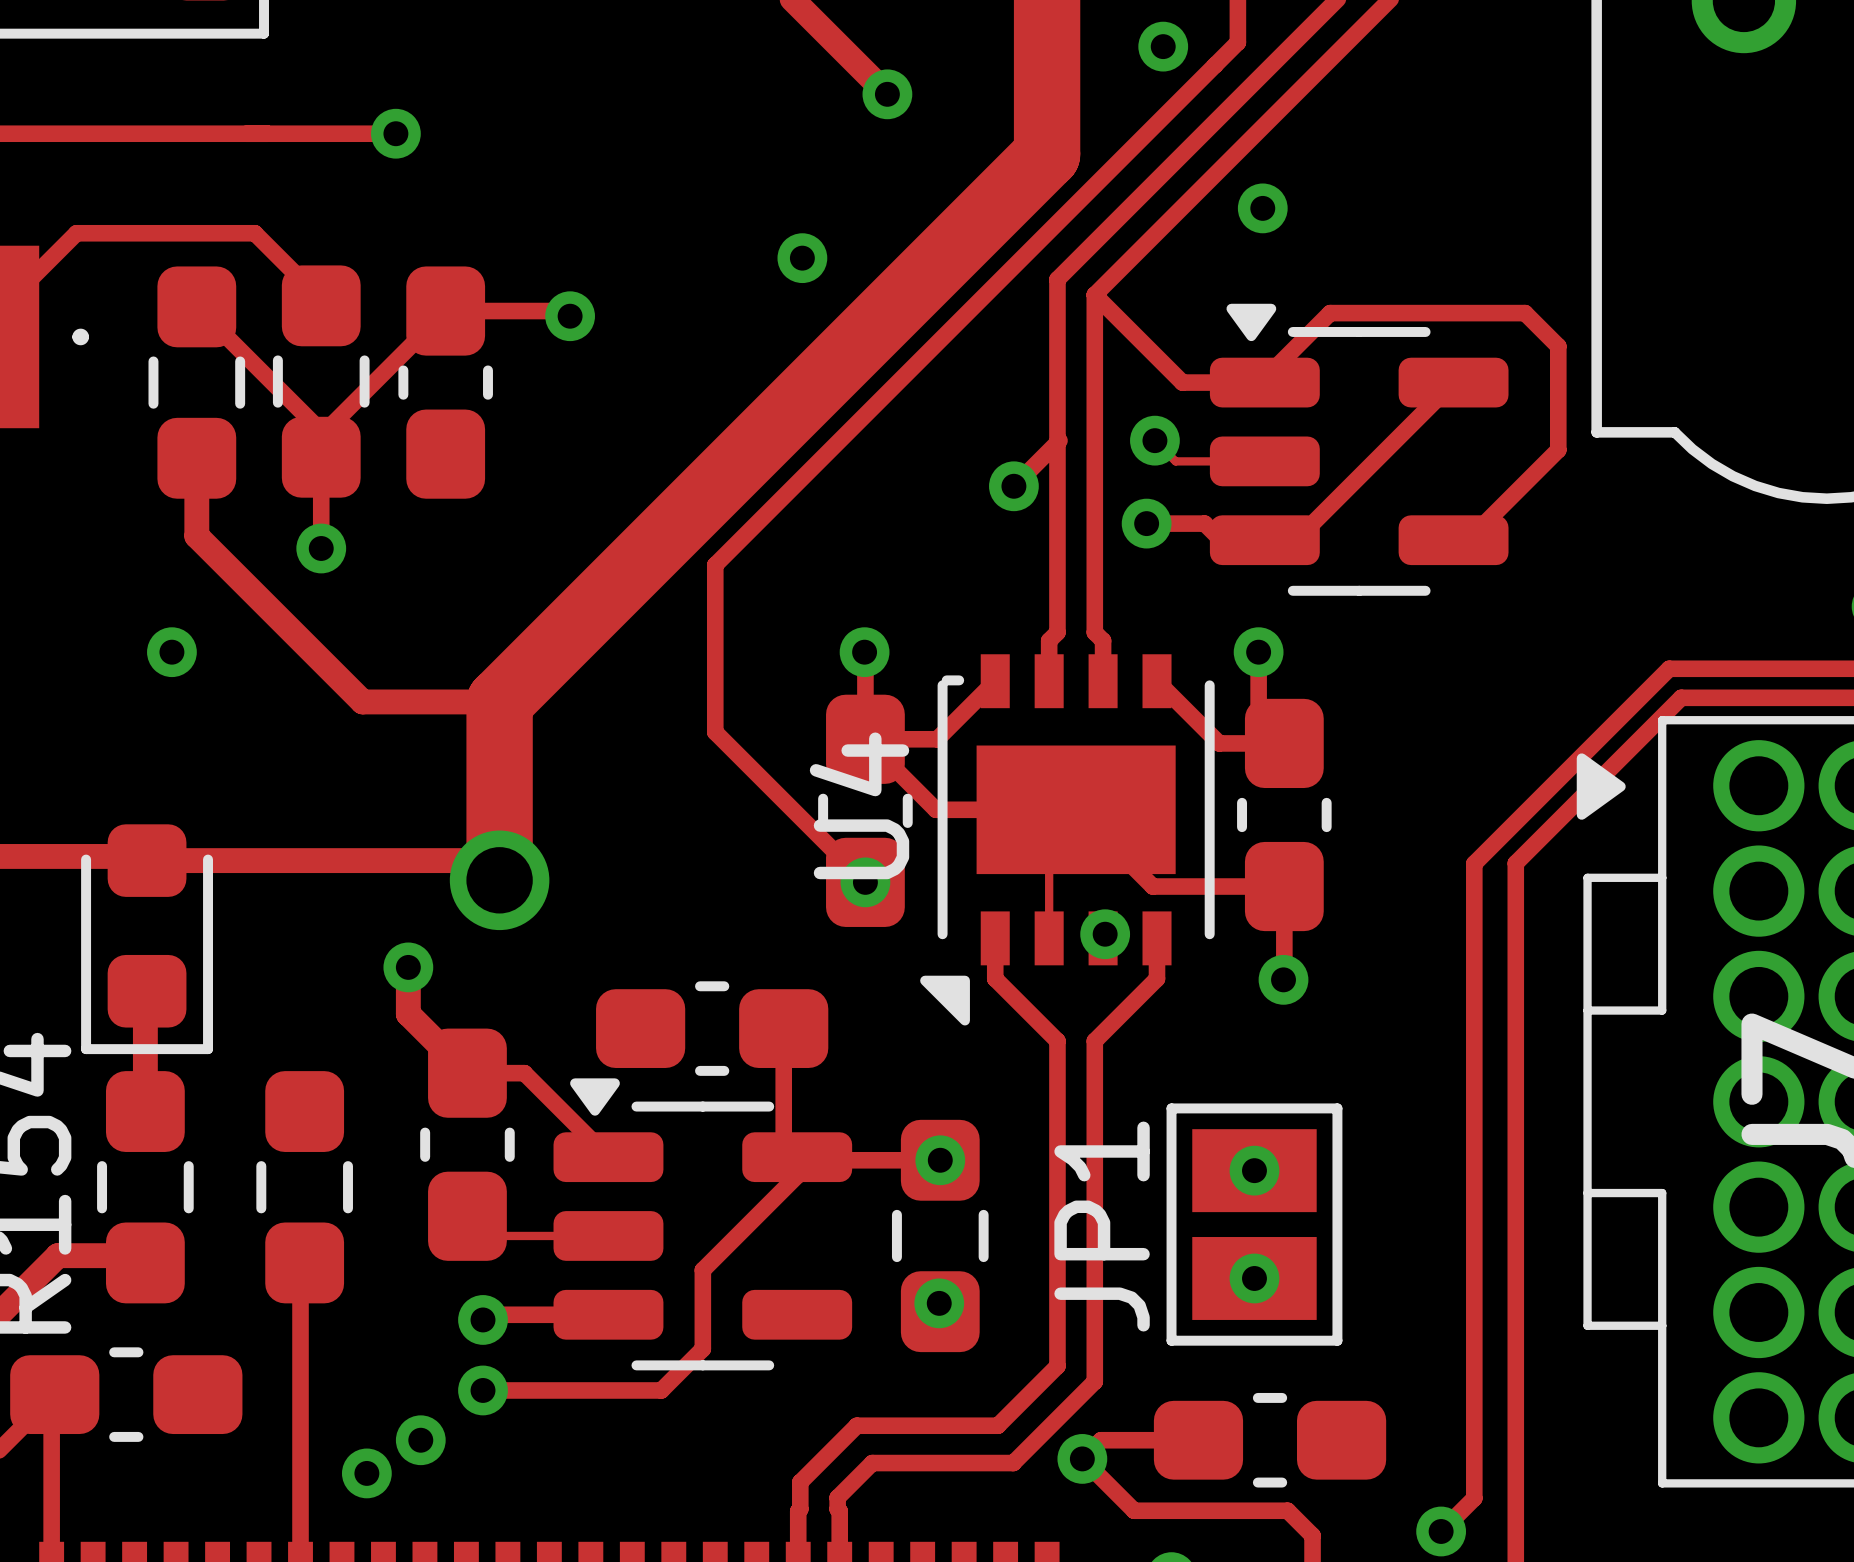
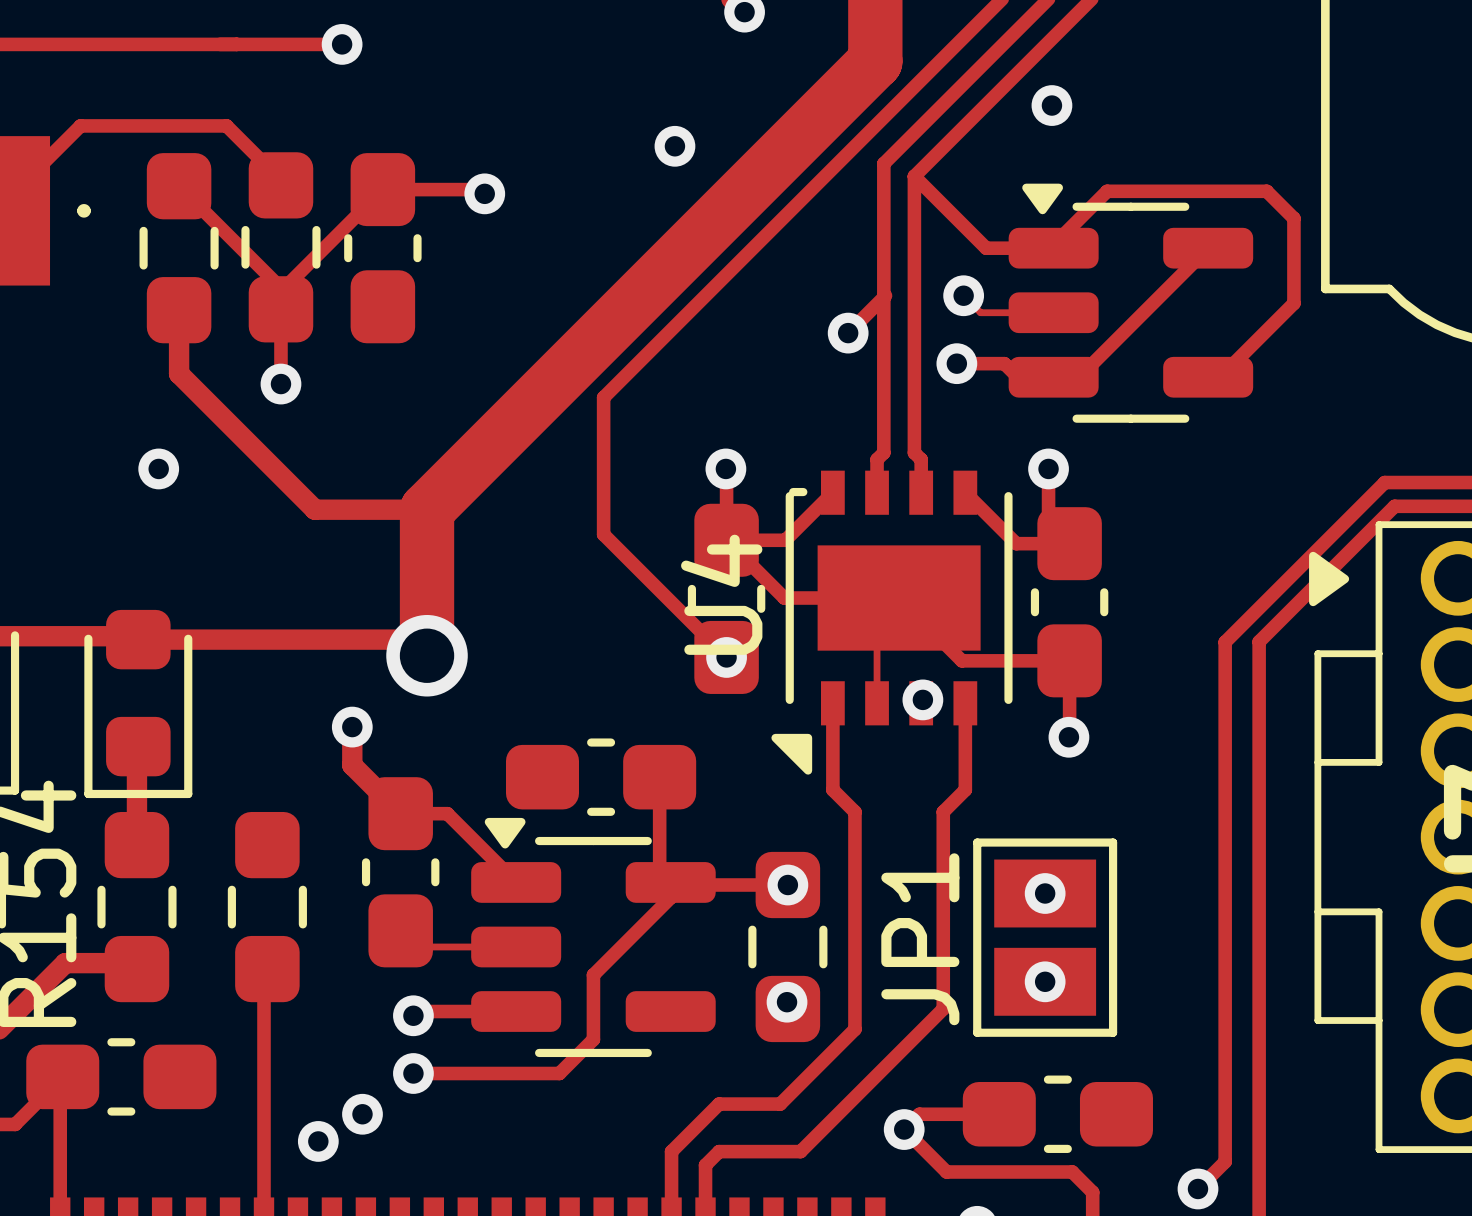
track: (995, 978) (1057, 1041) (1057, 1366) (997, 1425) (856, 1425) (800, 1482) (800, 1509) (798, 1511) -> (832, 736) (832, 789) (854, 811) (854, 1029) (780, 1104) (719, 1104) (671, 1151) (671, 1172)
track: (1157, 978) (1094, 1041) (1094, 1381) (1013, 1463) (872, 1463) (837, 1497) (837, 1509) (839, 1511) -> (965, 736) (965, 789) (943, 811) (943, 1008) (800, 1151) (719, 1151) (705, 1165) (705, 1172)

